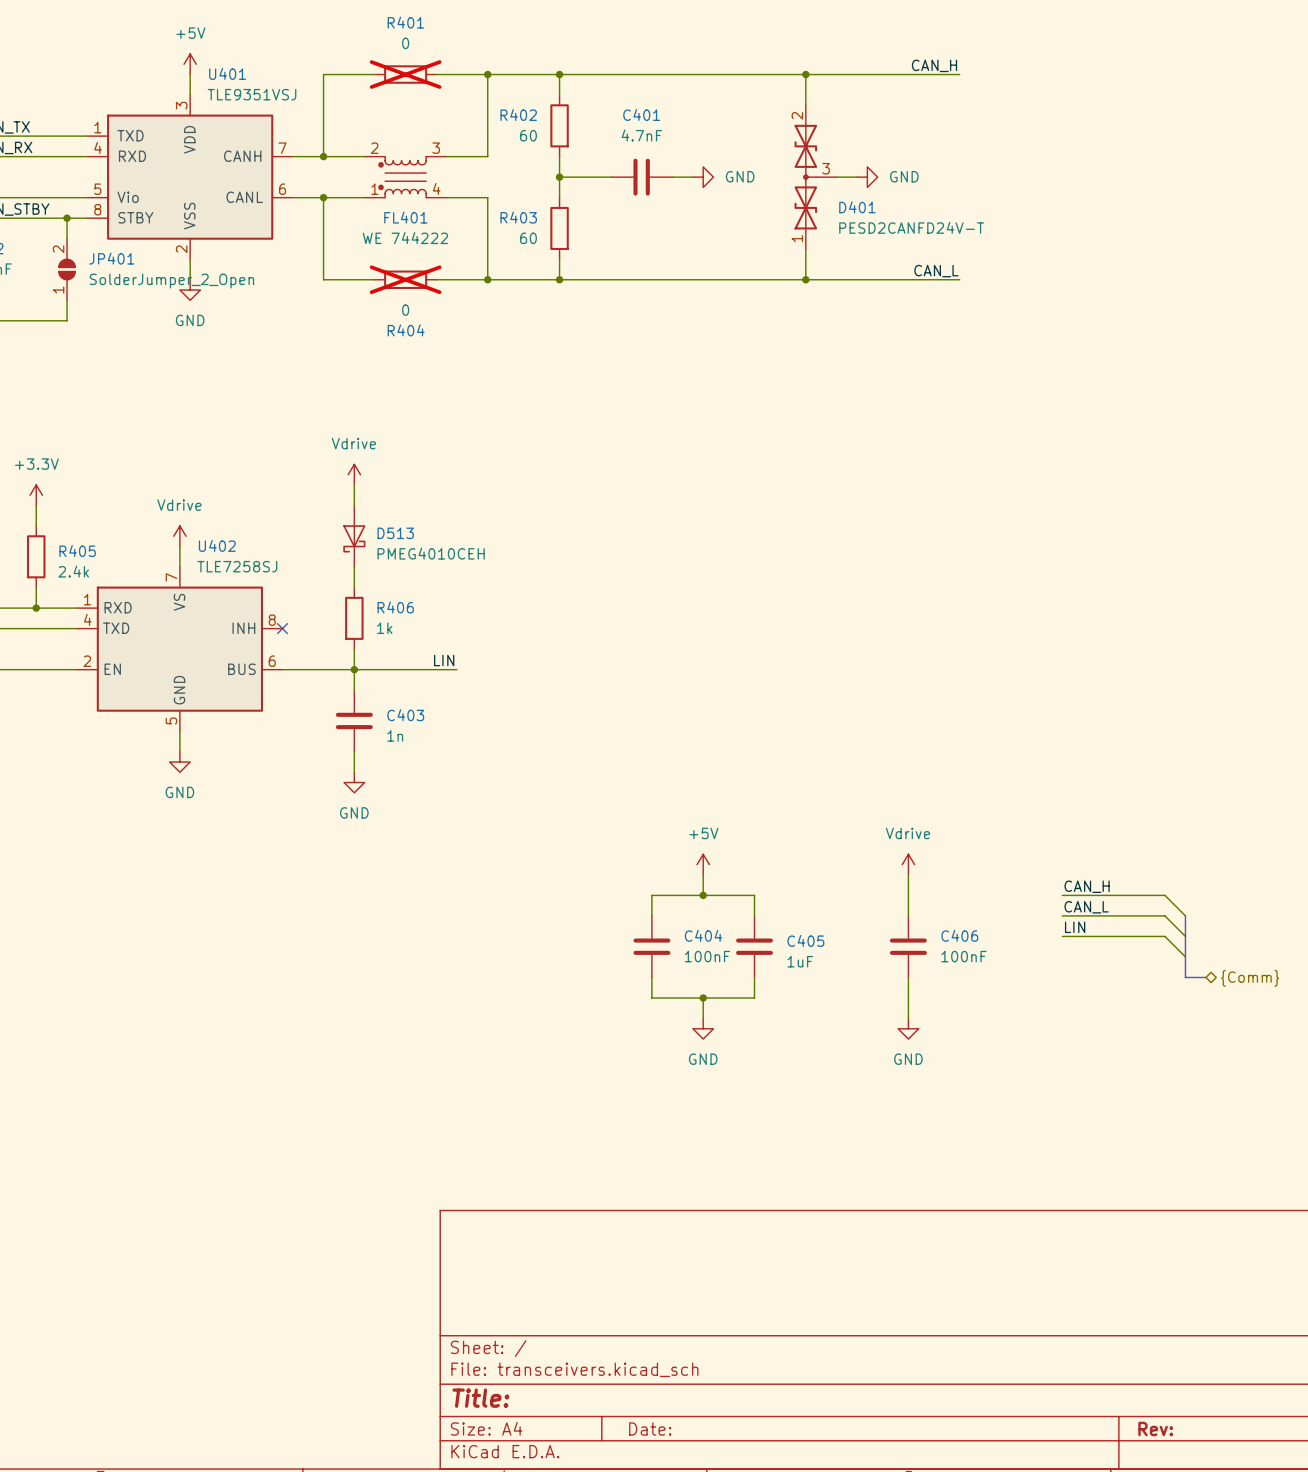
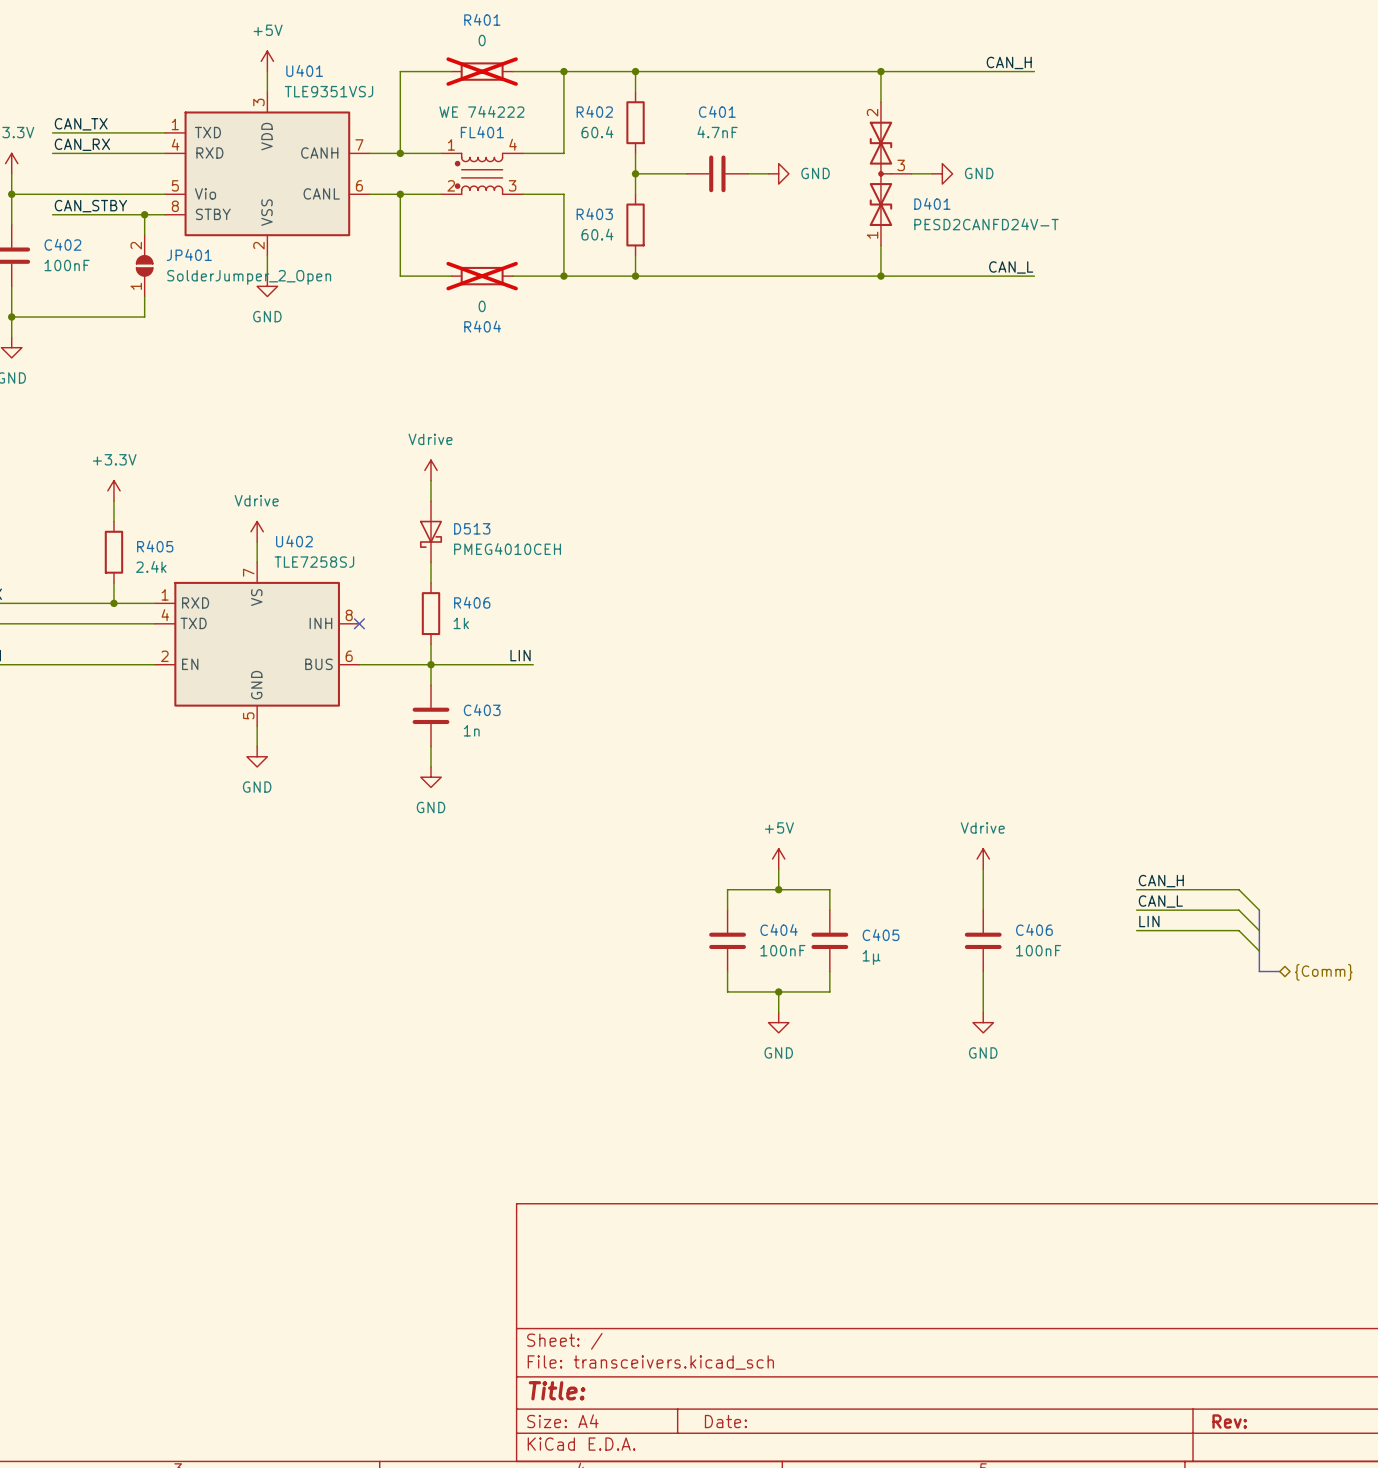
R402 value: 60 (528, 135) -> 60.4 (597, 132)
FL401 flip: as is (402, 177) -> up-down (479, 173)
R403 value: 60 (528, 238) -> 60.4 (597, 234)
C405 value: 1uF (800, 961) -> 1µ (871, 957)

